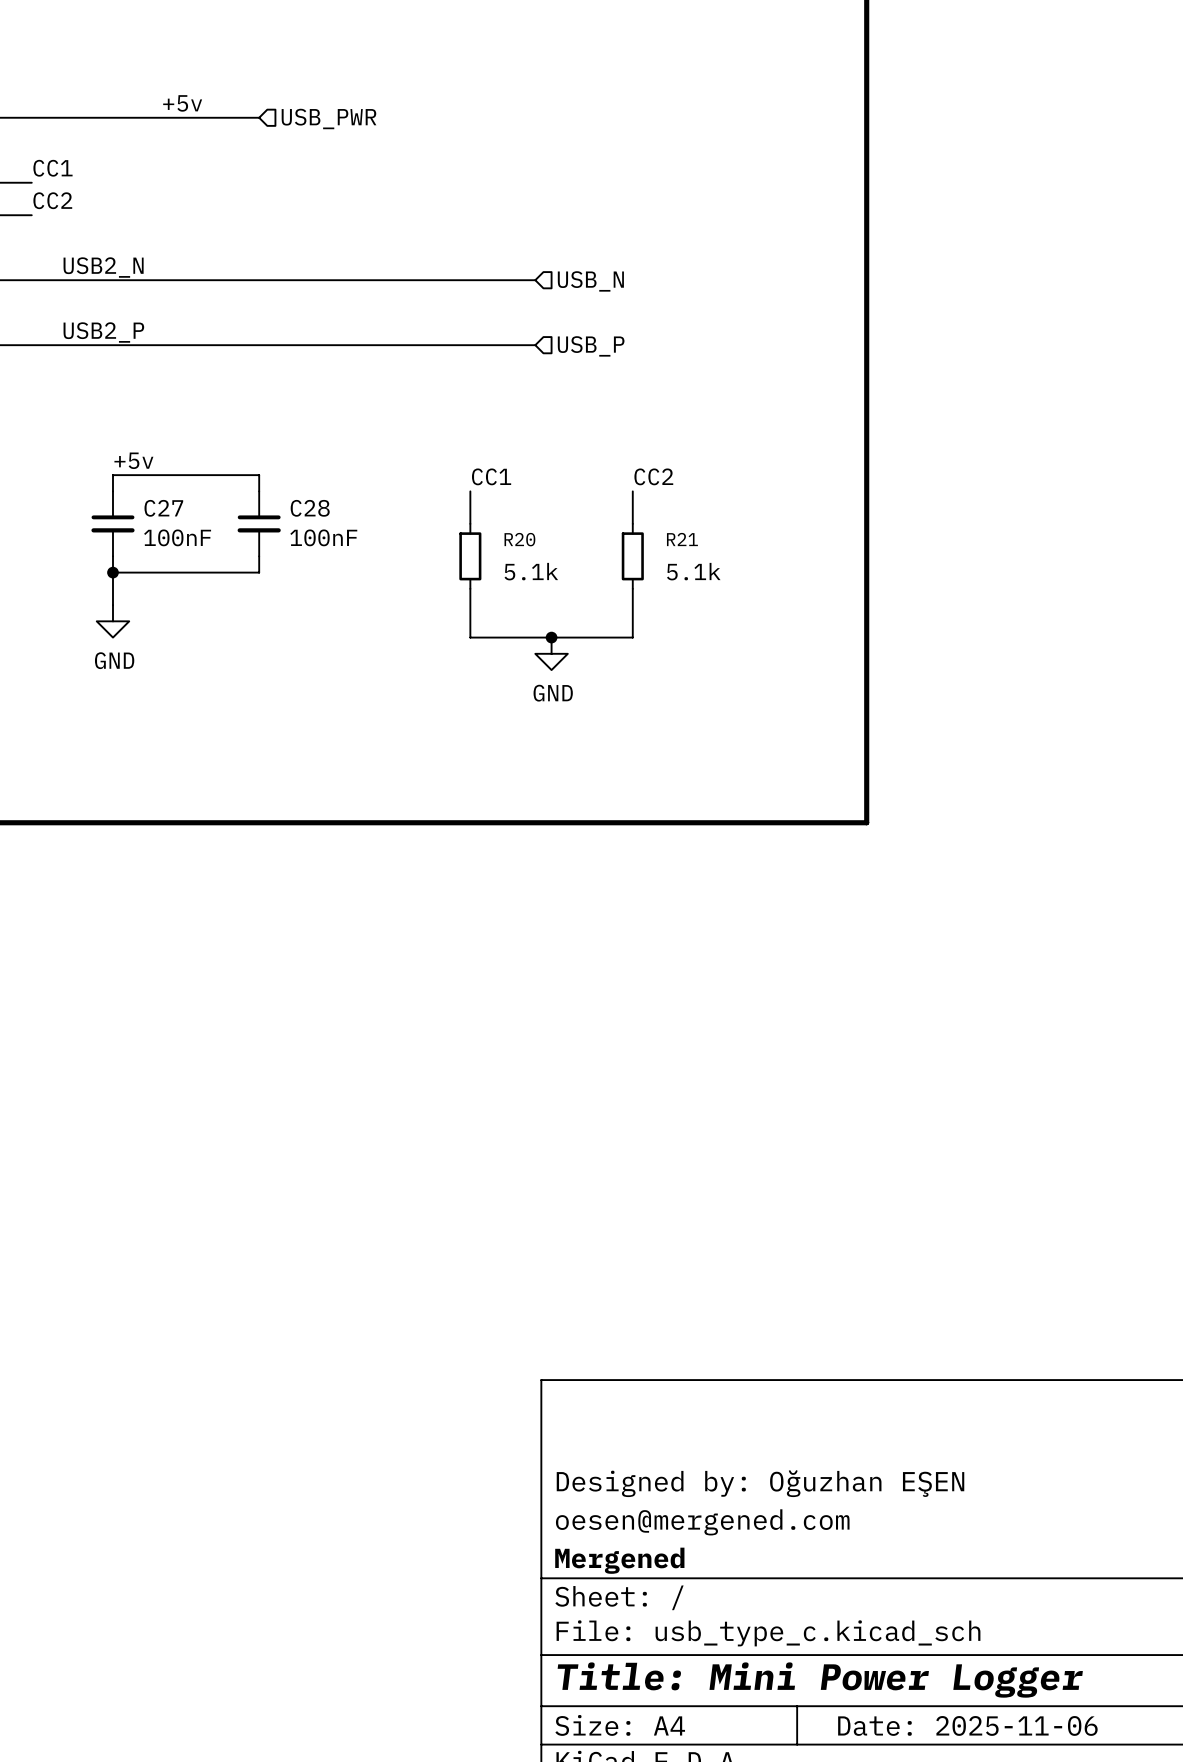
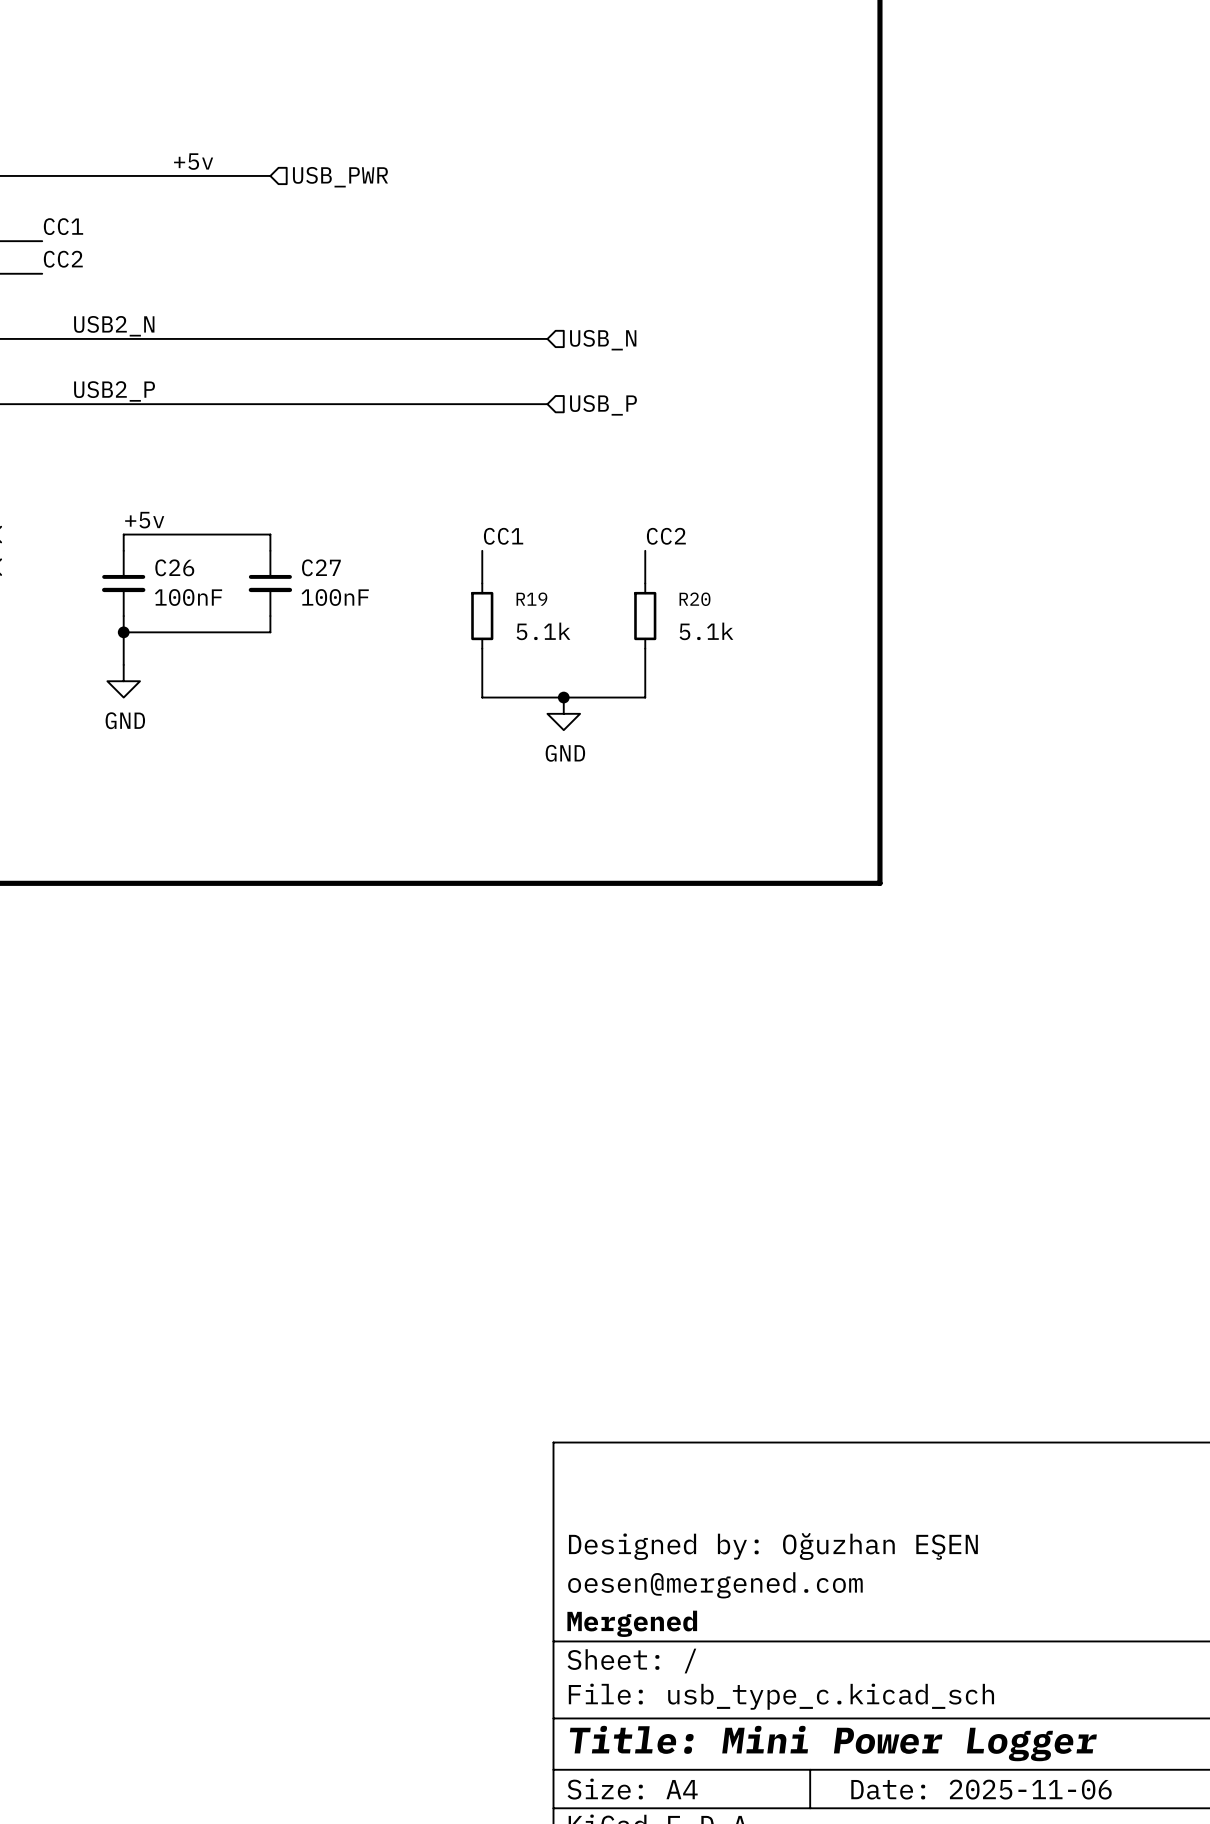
C27 name: C27 (163, 508) -> C26 (174, 567)
C28 name: C28 (310, 508) -> C27 (321, 567)
R20 name: R20 (519, 539) -> R19 (531, 599)
R21 name: R21 (682, 539) -> R20 (694, 599)

